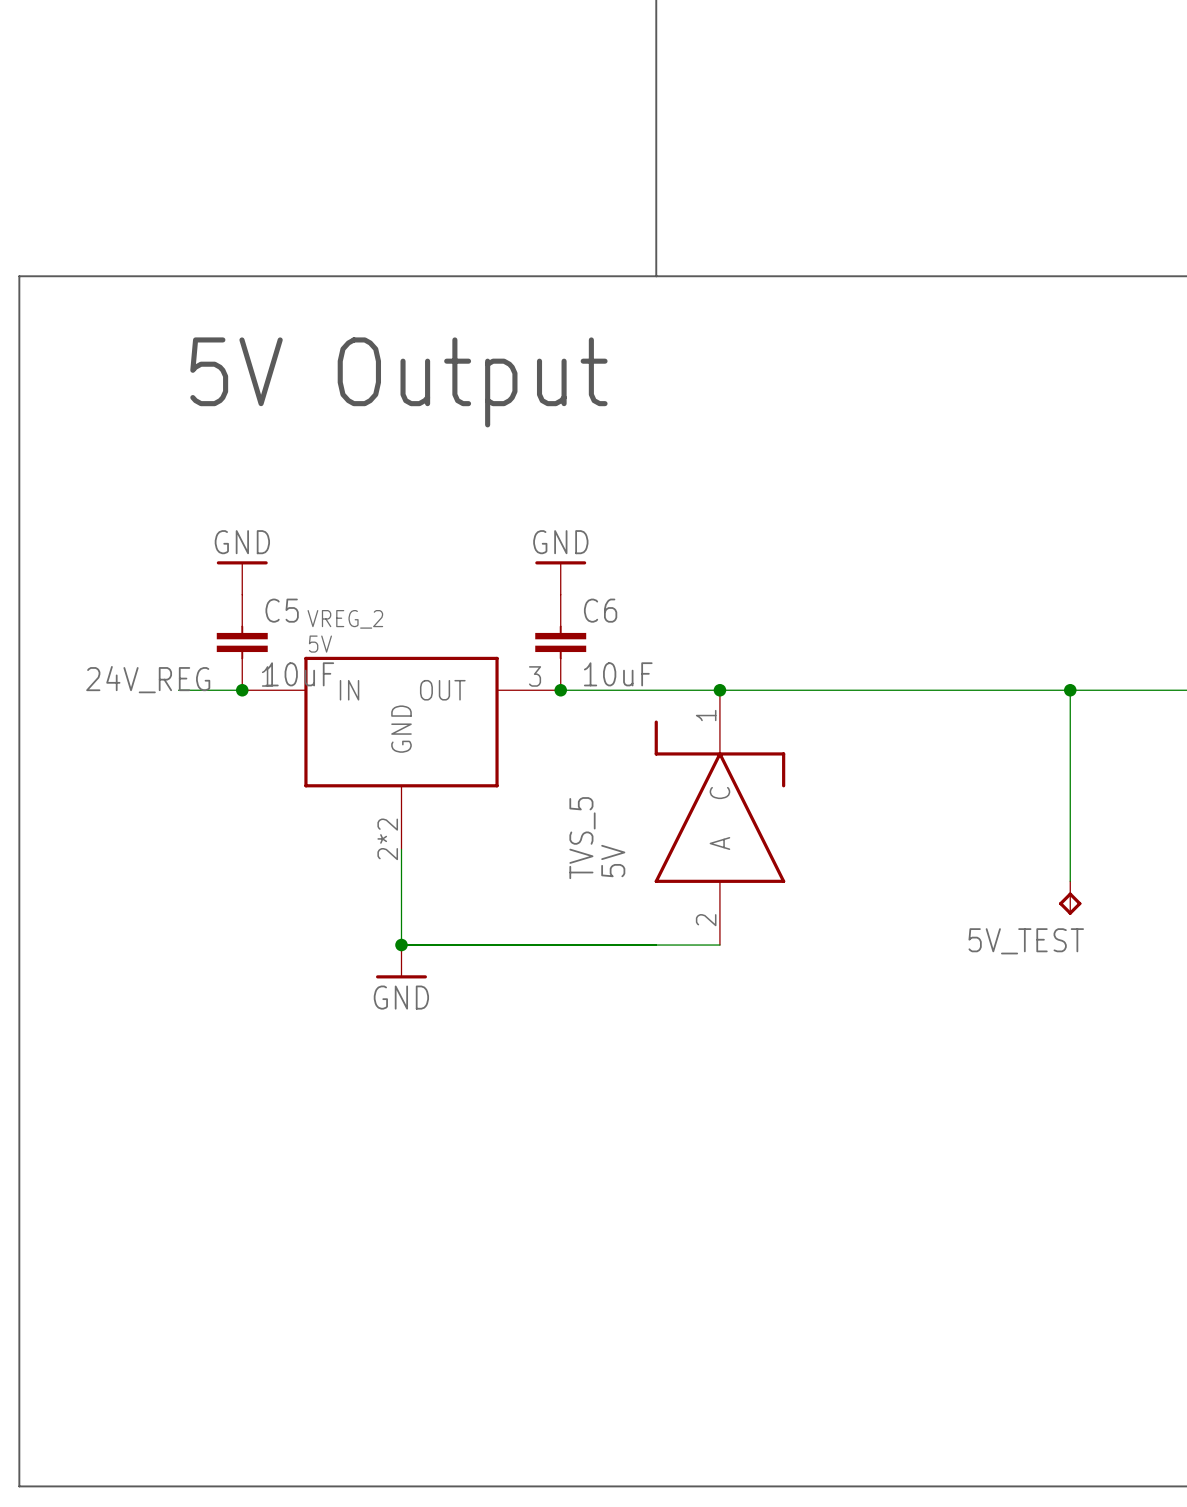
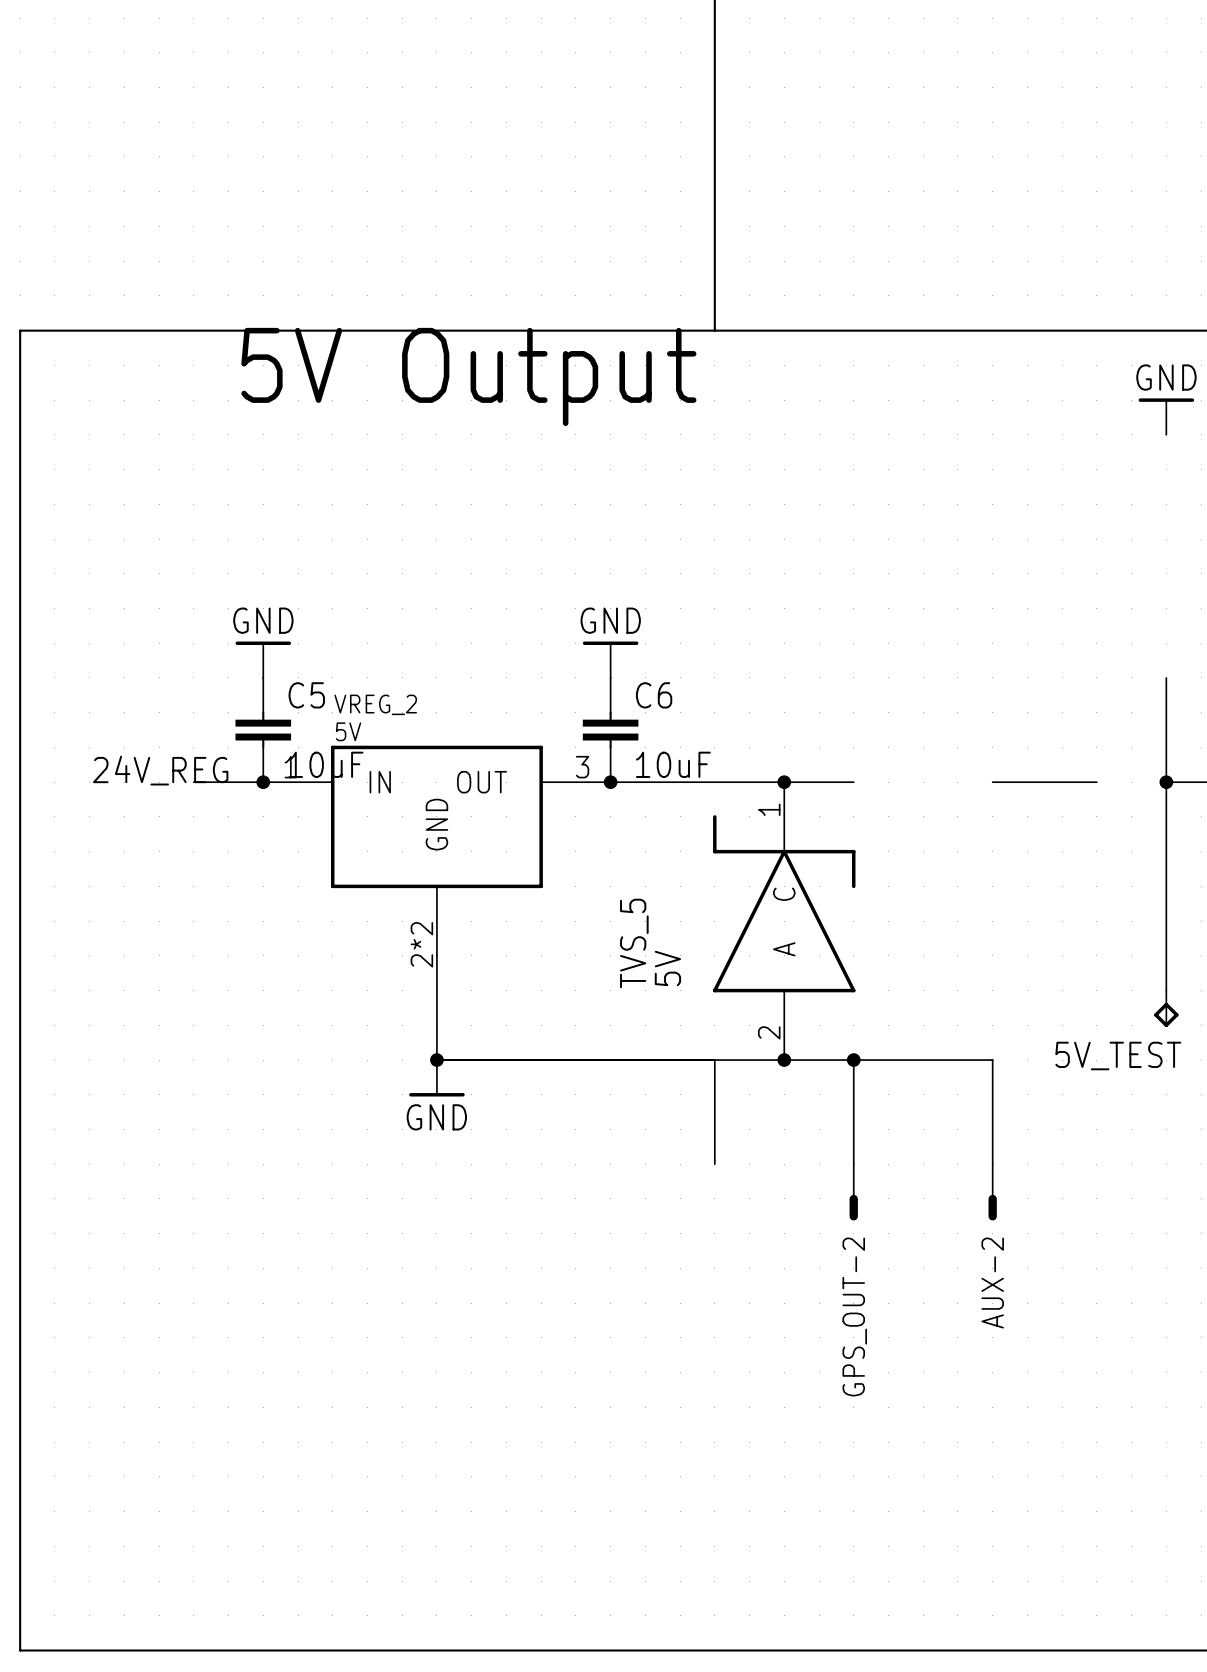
power symbol: none -> GND (1166, 416)
text position: 5V Output (398, 382) -> 5V Output (468, 376)
wire: (783, 690) (911, 690) -> none
wire: (1006, 690) (1070, 690) -> (1166, 677) (1166, 782)
wire: none -> (714, 1060) (714, 1164)
wire: none -> (784, 1060) (992, 1060) (992, 1164)
junction: none -> (784, 1060)
wire: none -> (853, 1060) (853, 1164)
junction: none -> (853, 1060)
GPS_OUT-2: none -> (853, 1192)
AUX-2: none -> (992, 1192)

